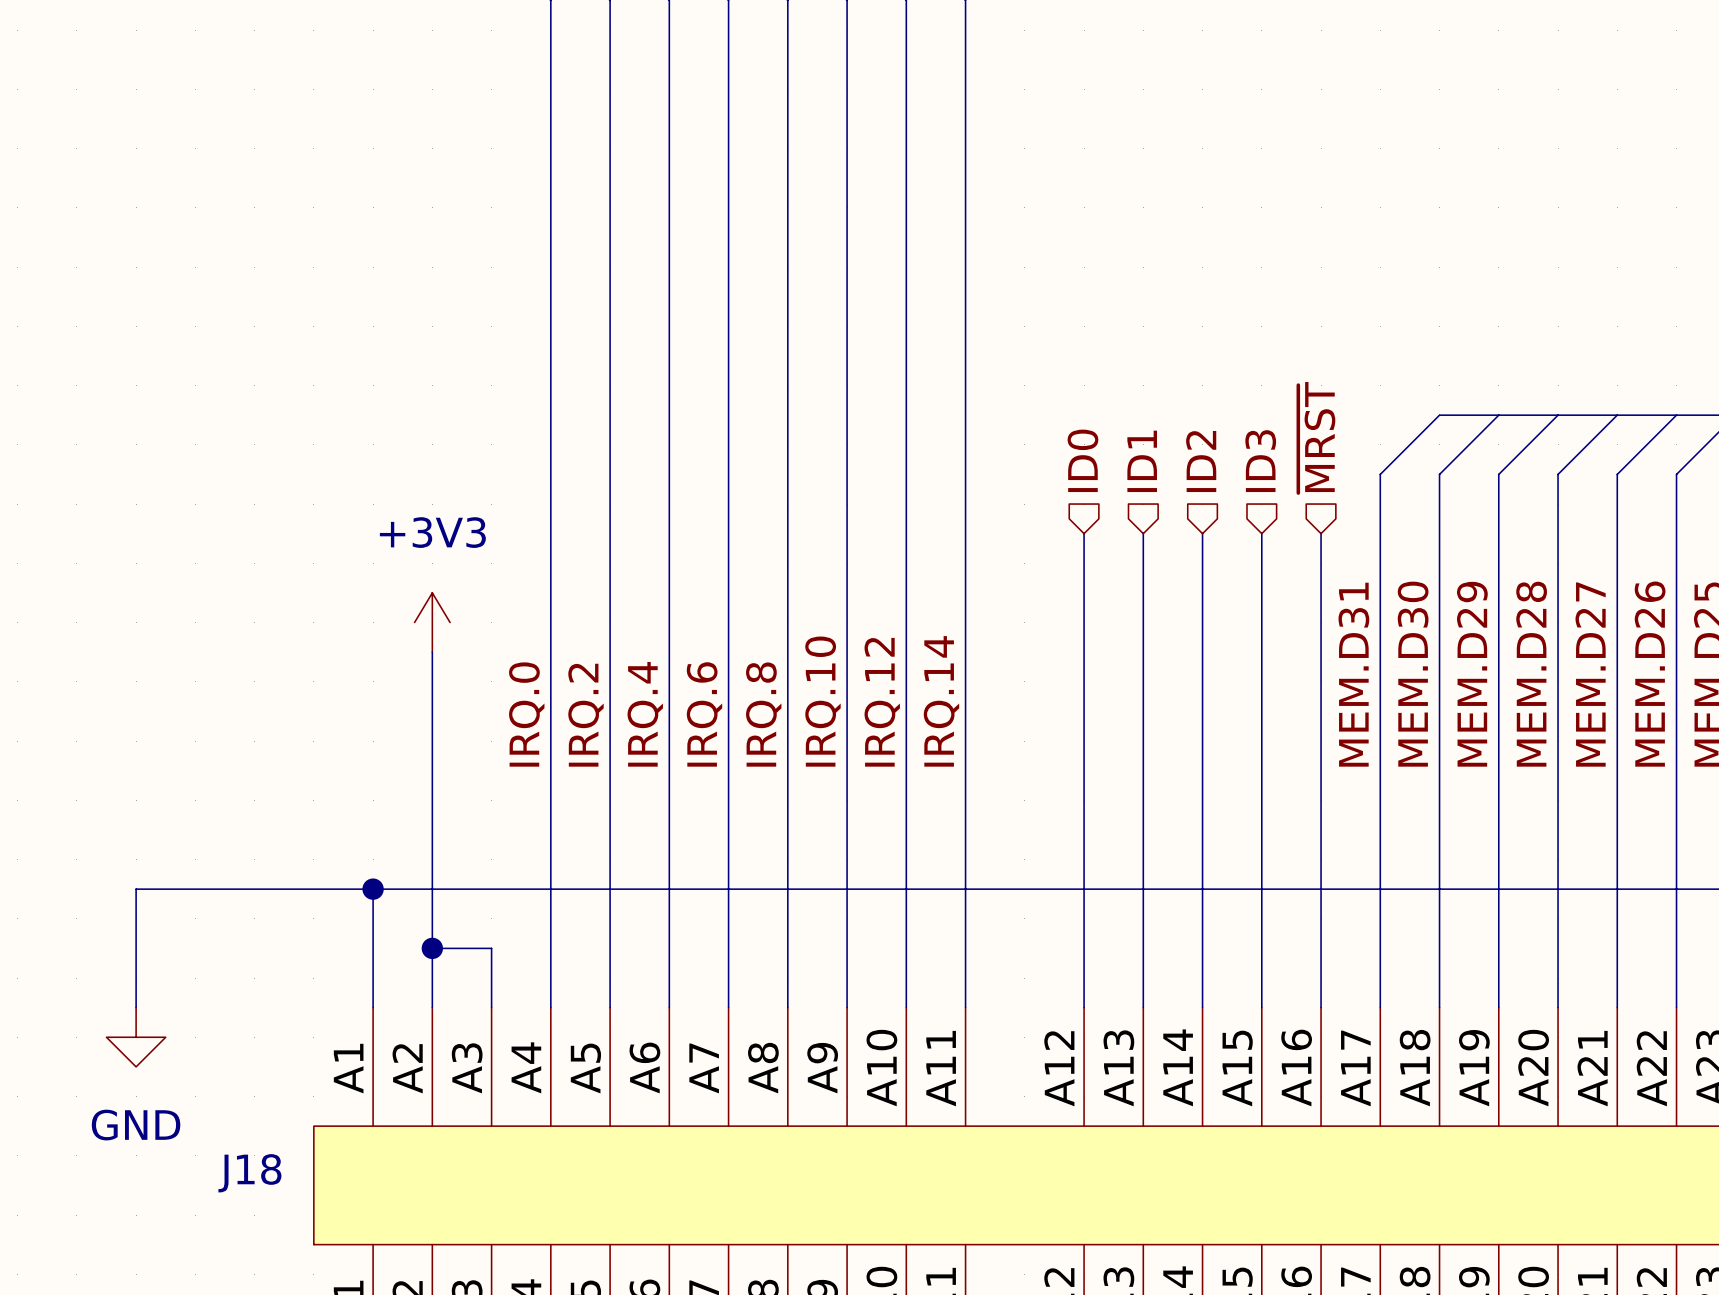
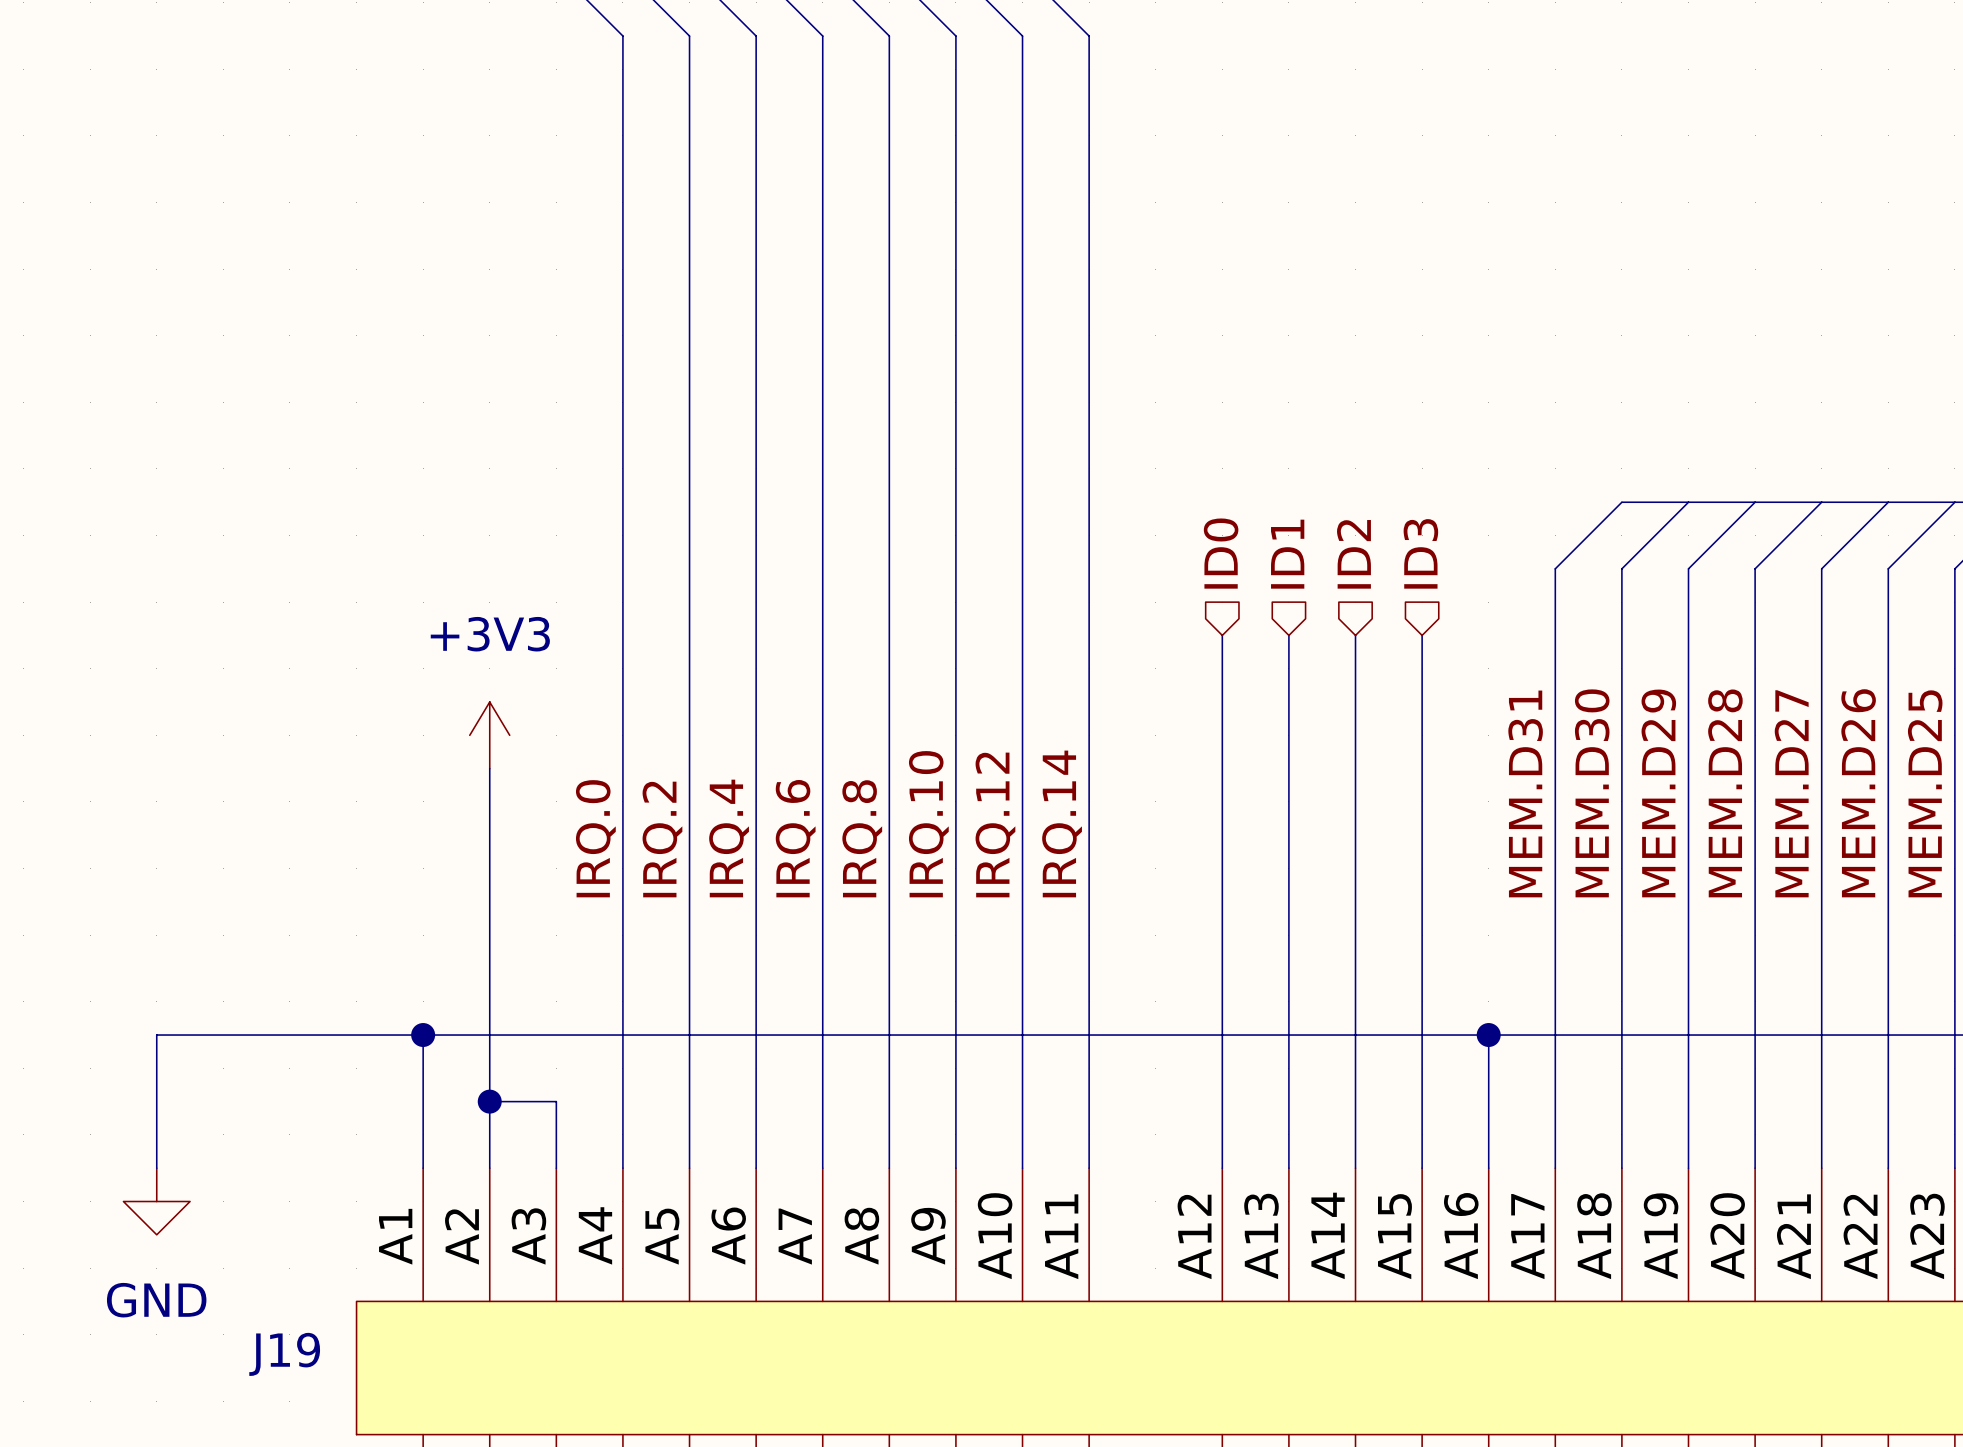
hierarchical label: ~{MRST} (1316, 437) -> none
wire: (1321, 533) (1321, 889) -> none
junction: none -> (1488, 1035)
J18 name: J18 (249, 1173) -> J19 (284, 1354)

